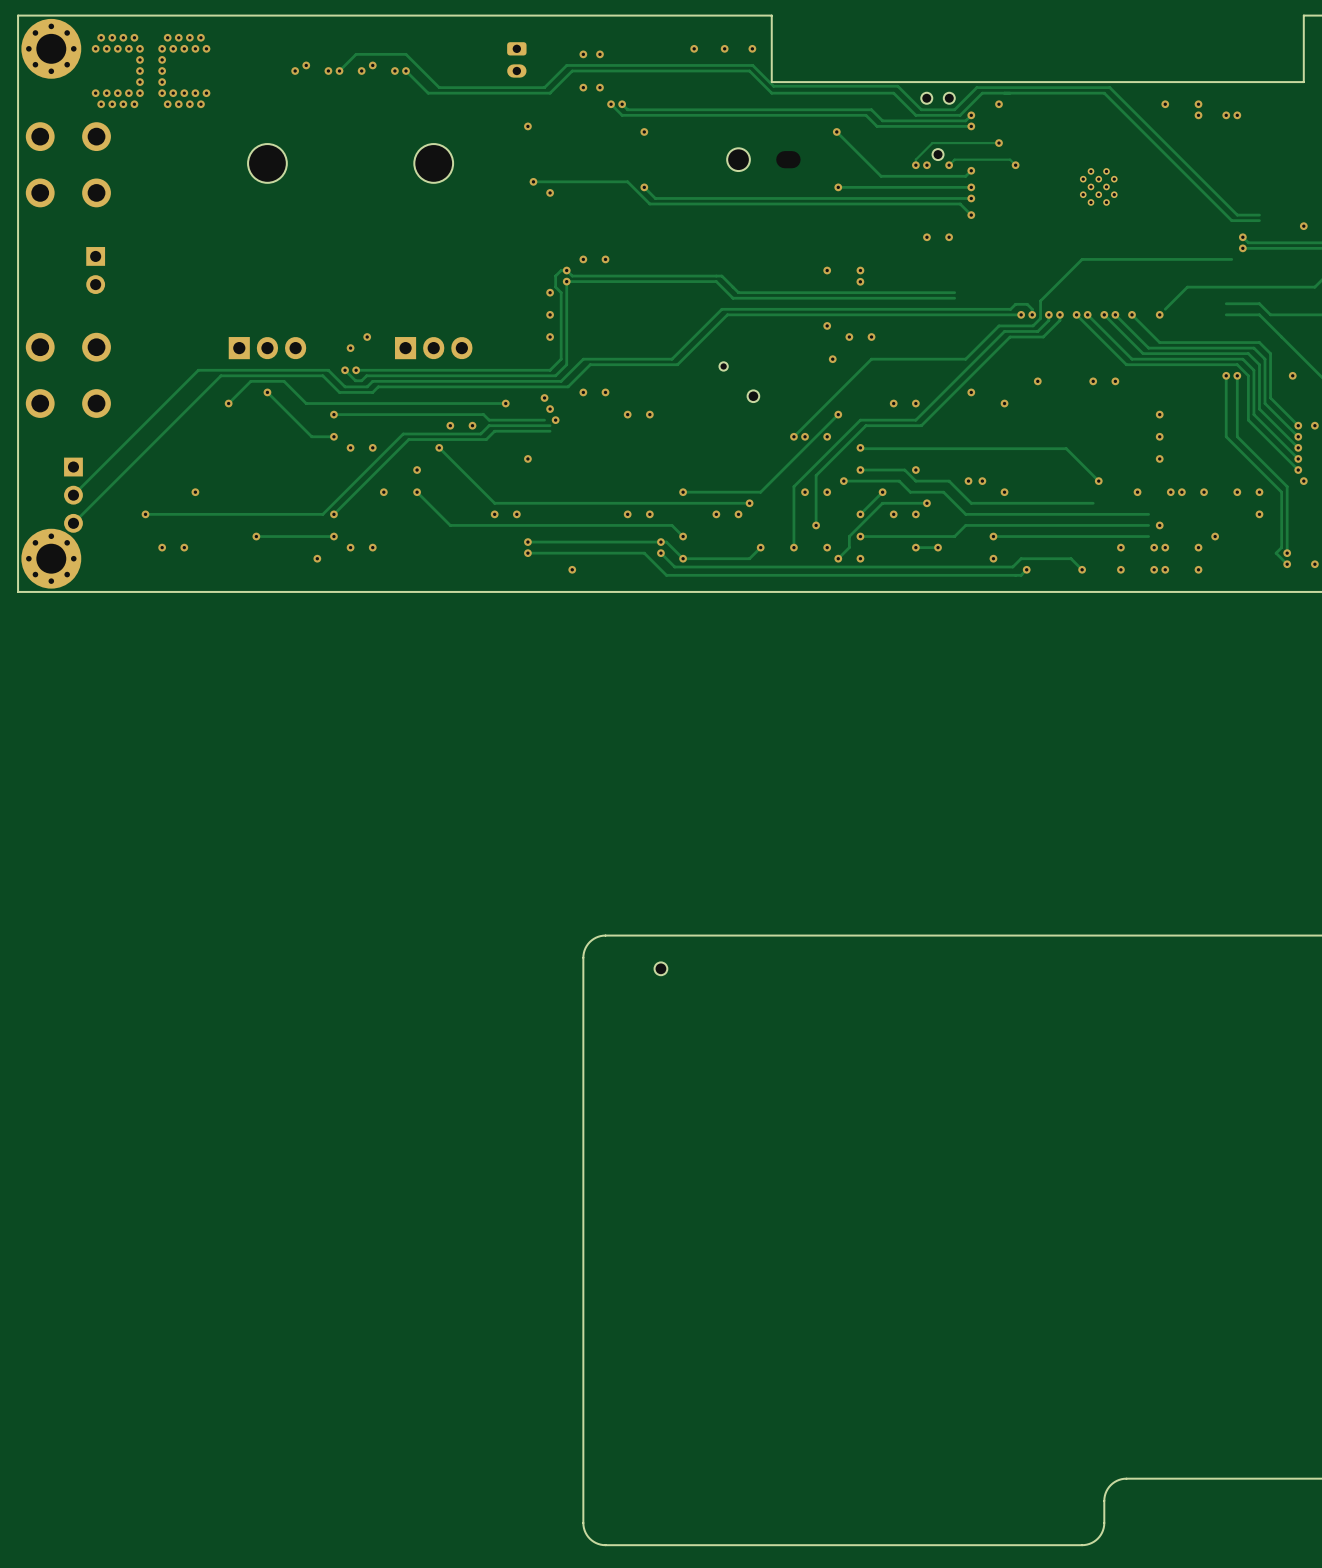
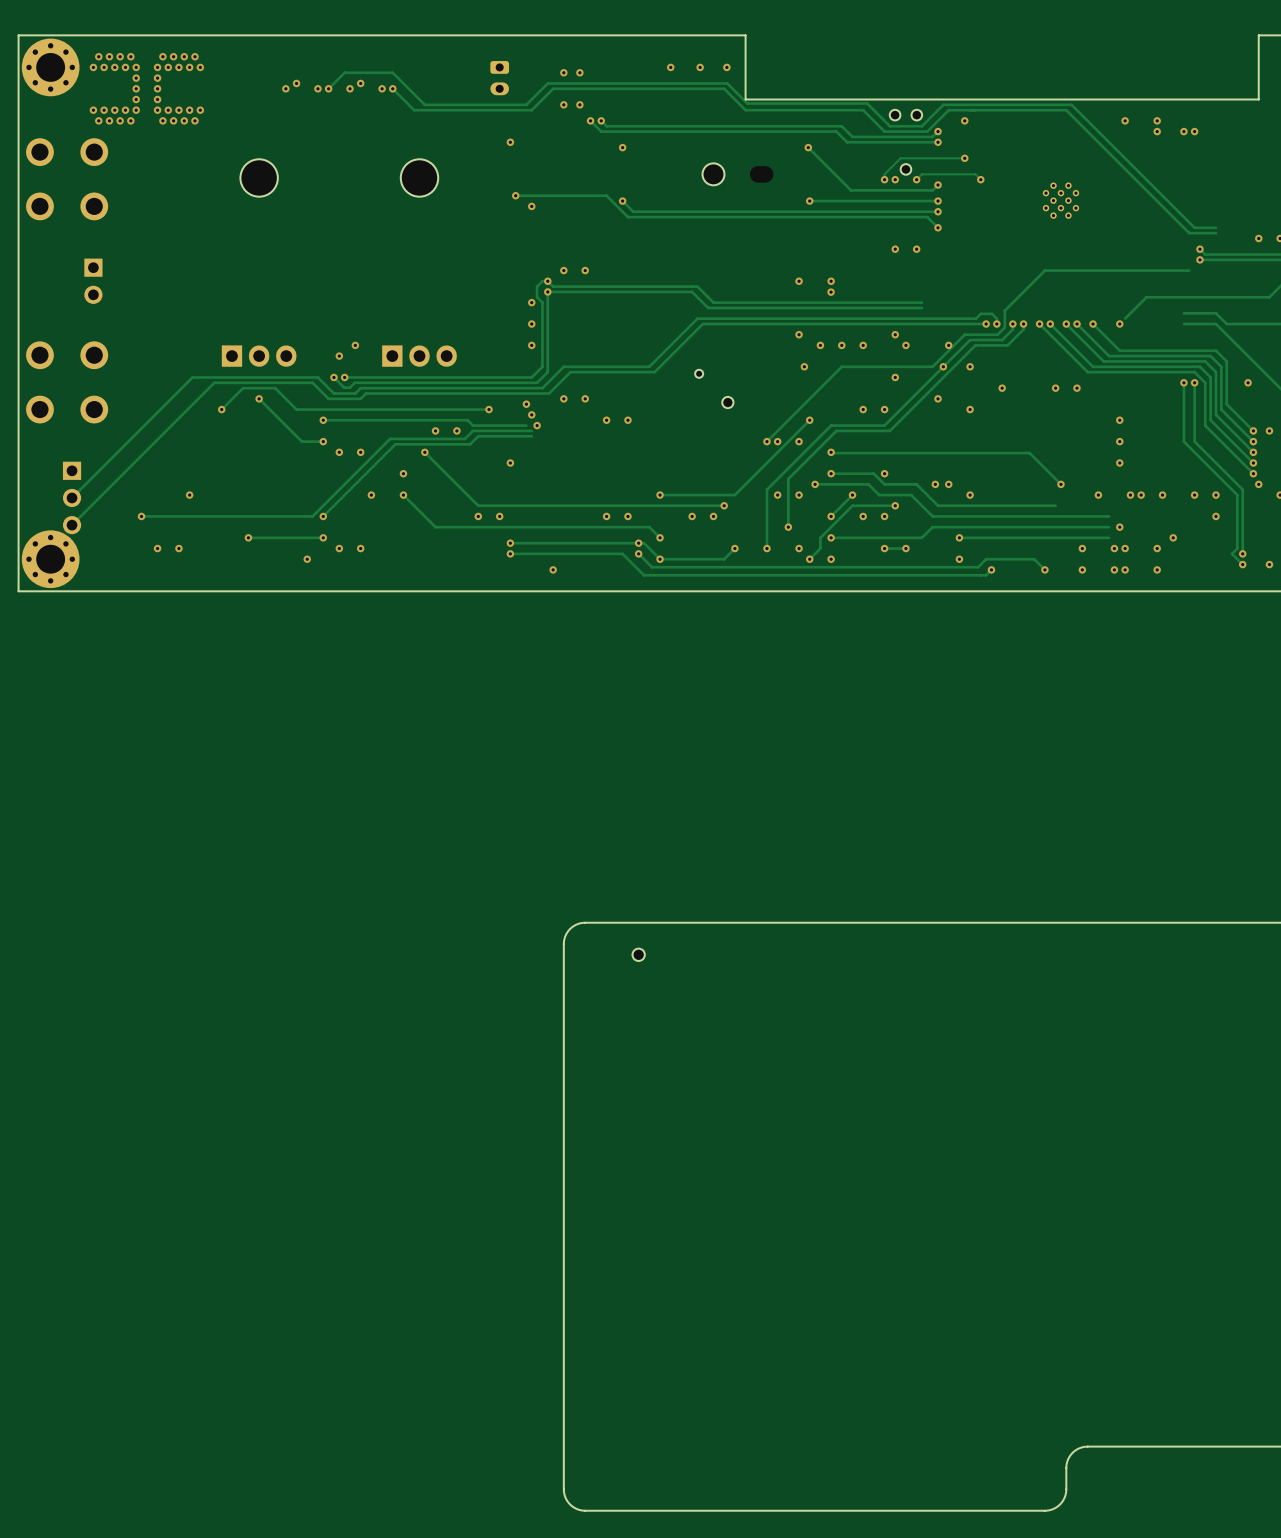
via: none -> (895, 334)
via: none -> (863, 345)
via: none -> (905, 345)
via: none -> (948, 345)
via: none -> (943, 366)
via: none -> (970, 366)
via: none -> (895, 377)

